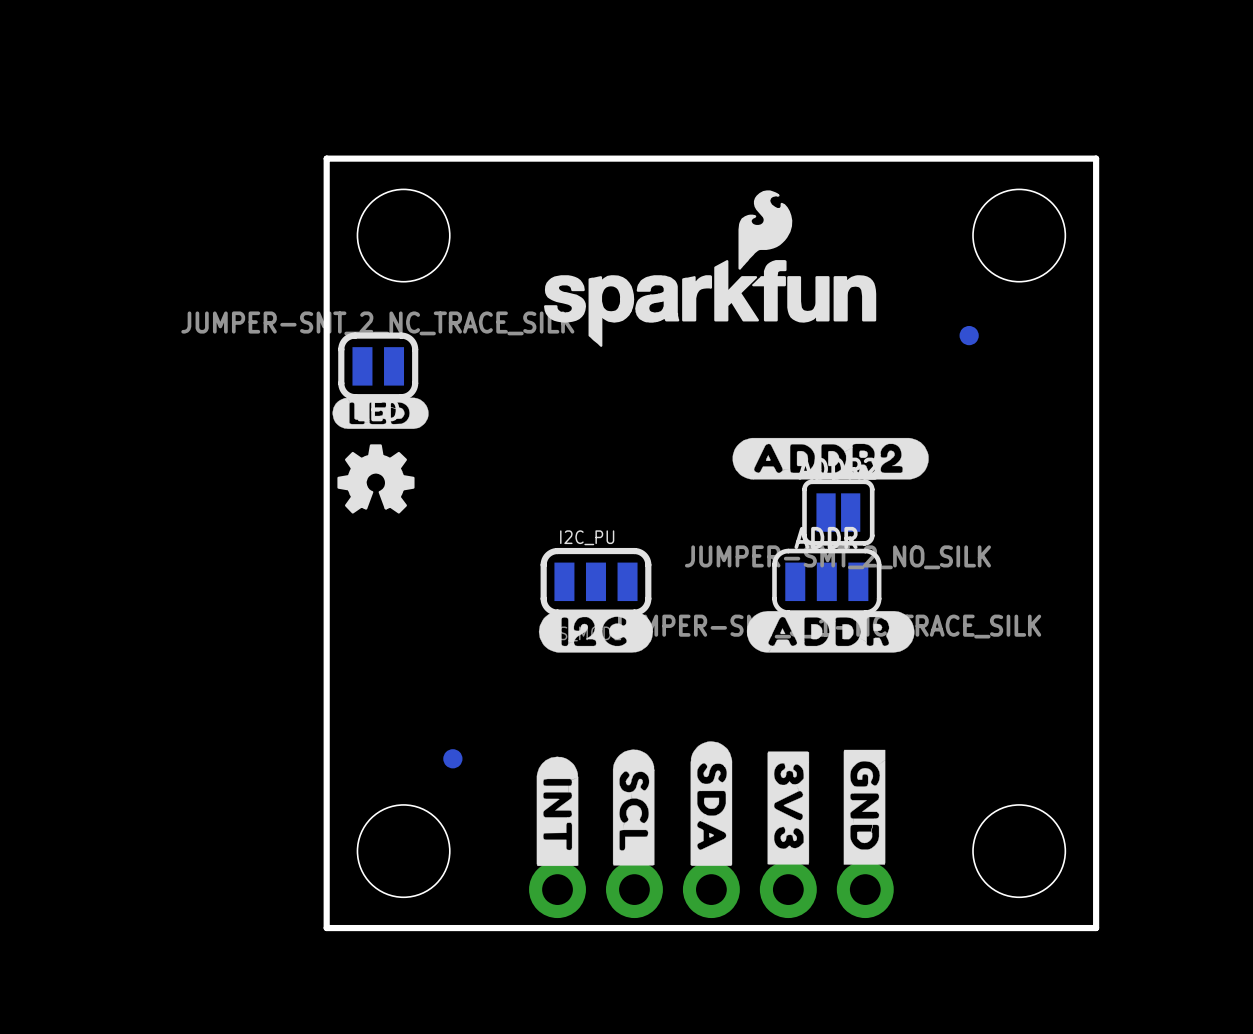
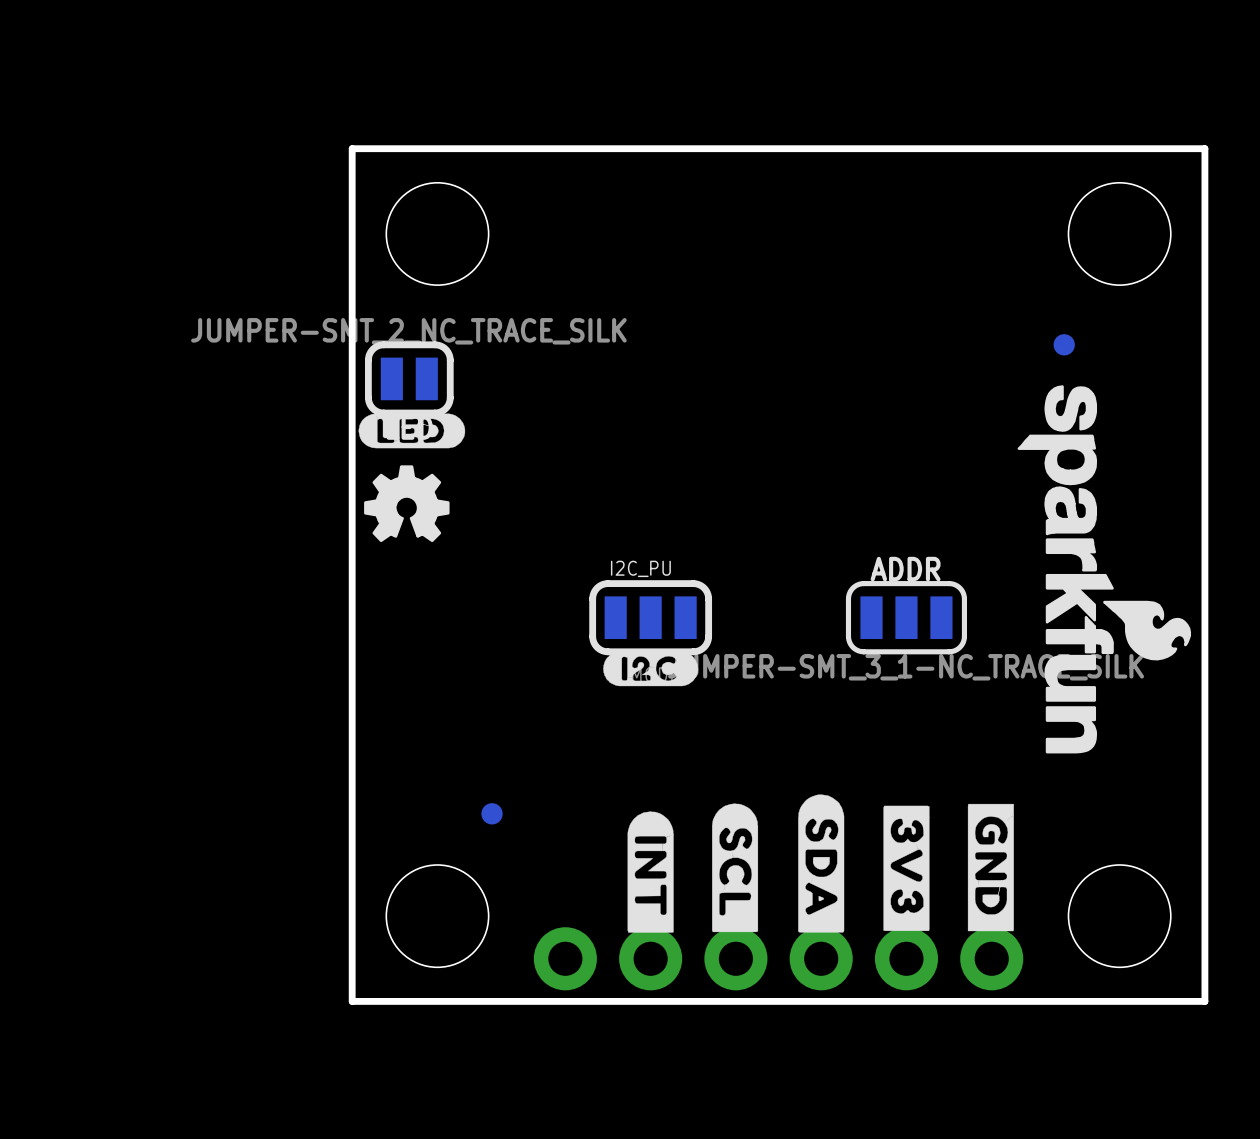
drawing: [544, 190, 877, 347] -> none
drawing: none -> [1017, 385, 1192, 754]
drawing: [732, 437, 929, 480] -> none
part: JUMPER-SMT_2_NO_SILK (838, 512) -> none
drawing shape: [538, 611, 654, 653] -> [603, 651, 699, 687]
drawing: [746, 611, 915, 653] -> none
drawing position: (711, 803) -> (821, 863)
drawing position: (633, 807) -> (735, 867)
drawing position: (864, 807) -> (990, 867)
drawing position: (788, 808) -> (906, 868)
drawing position: (557, 811) -> (650, 872)
part footprint: [529, 861, 894, 919] -> [533, 927, 1024, 991]

